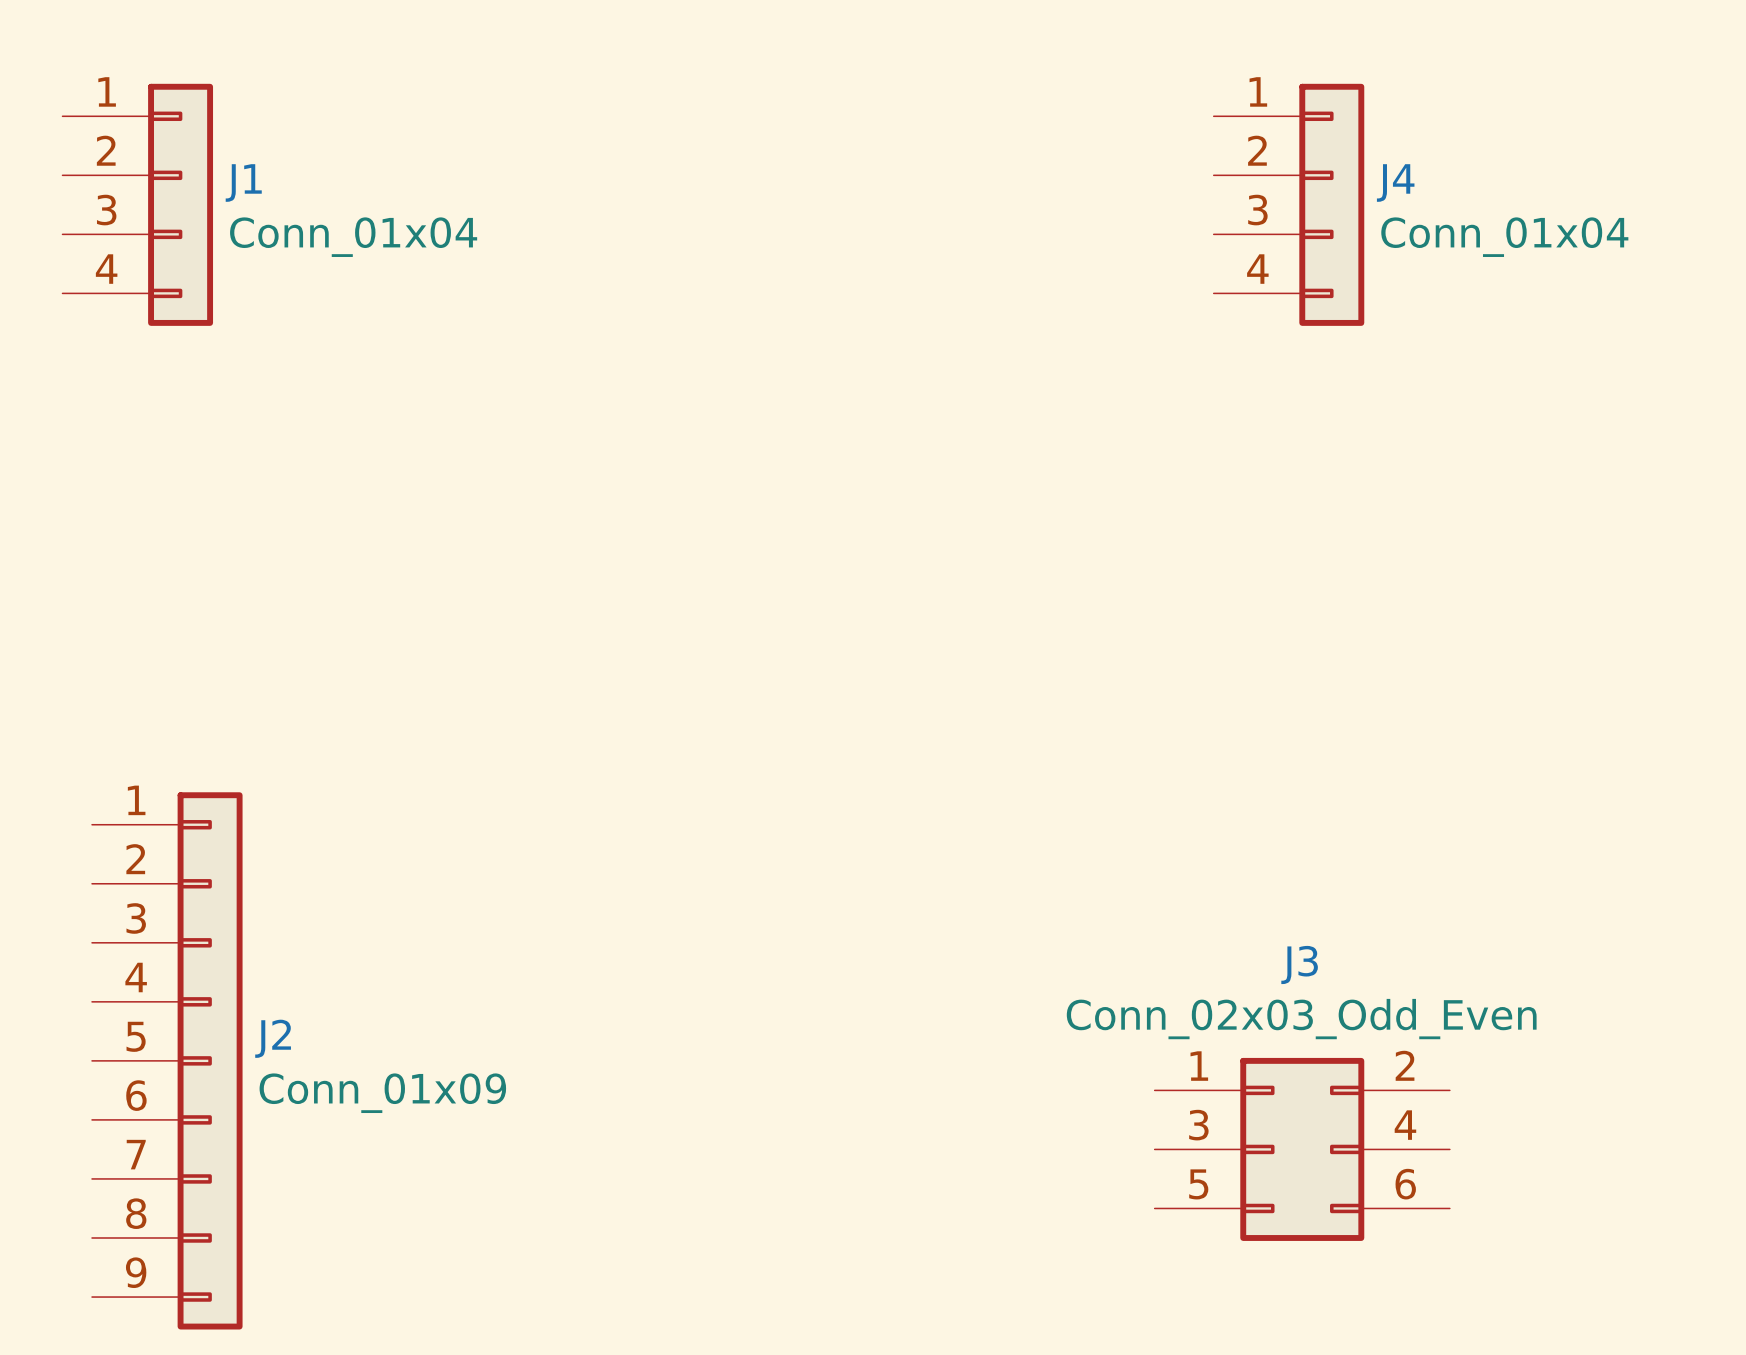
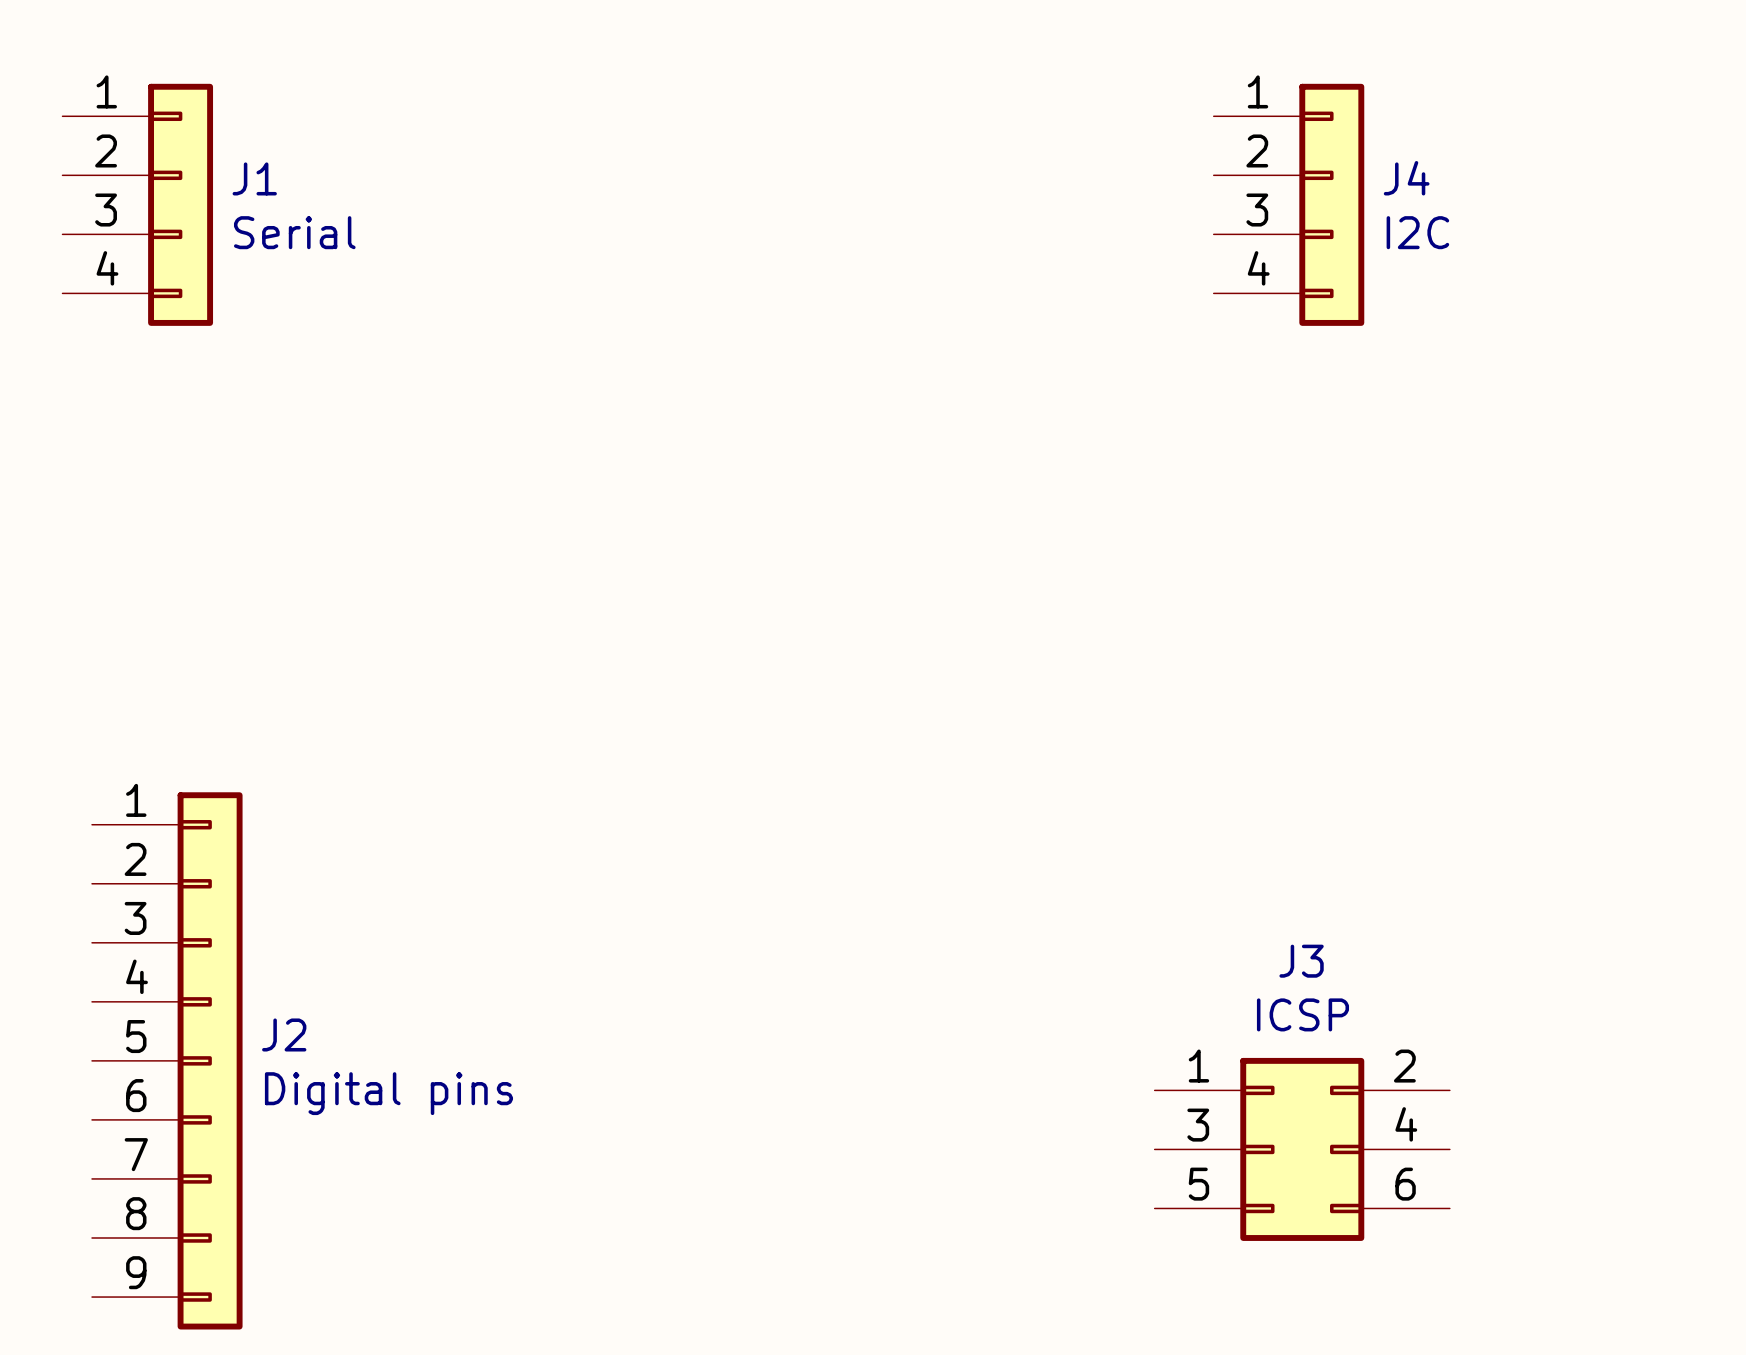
J1 value: Conn_01x04 (353, 237) -> Serial (294, 232)
J4 value: Conn_01x04 (1504, 237) -> I2C (1417, 232)
J3 value: Conn_02x03_Odd_Even (1301, 1019) -> ICSP (1302, 1014)
J2 value: Conn_01x09 (382, 1093) -> Digital pins (388, 1093)

